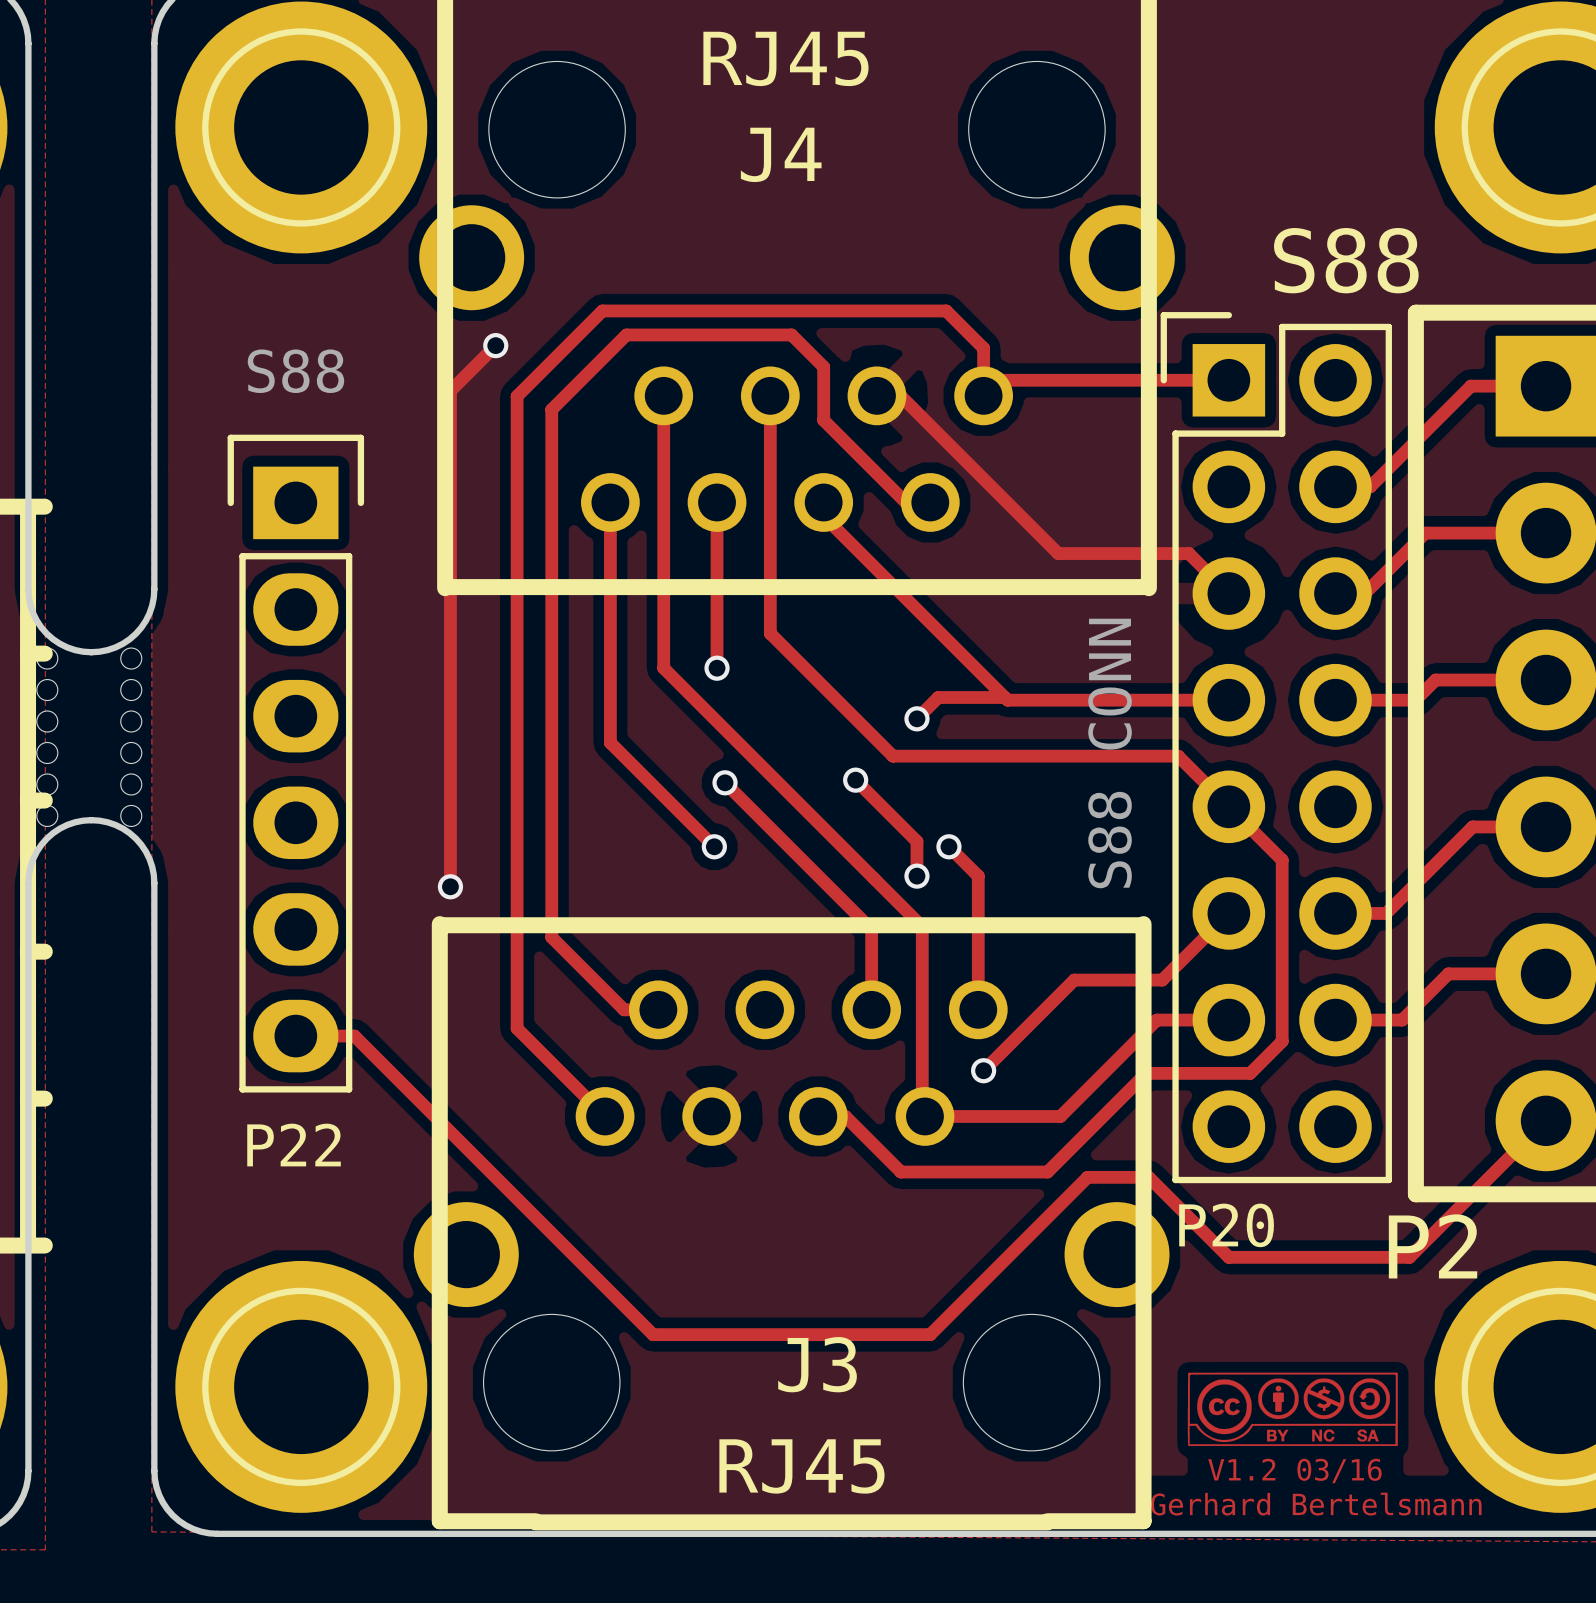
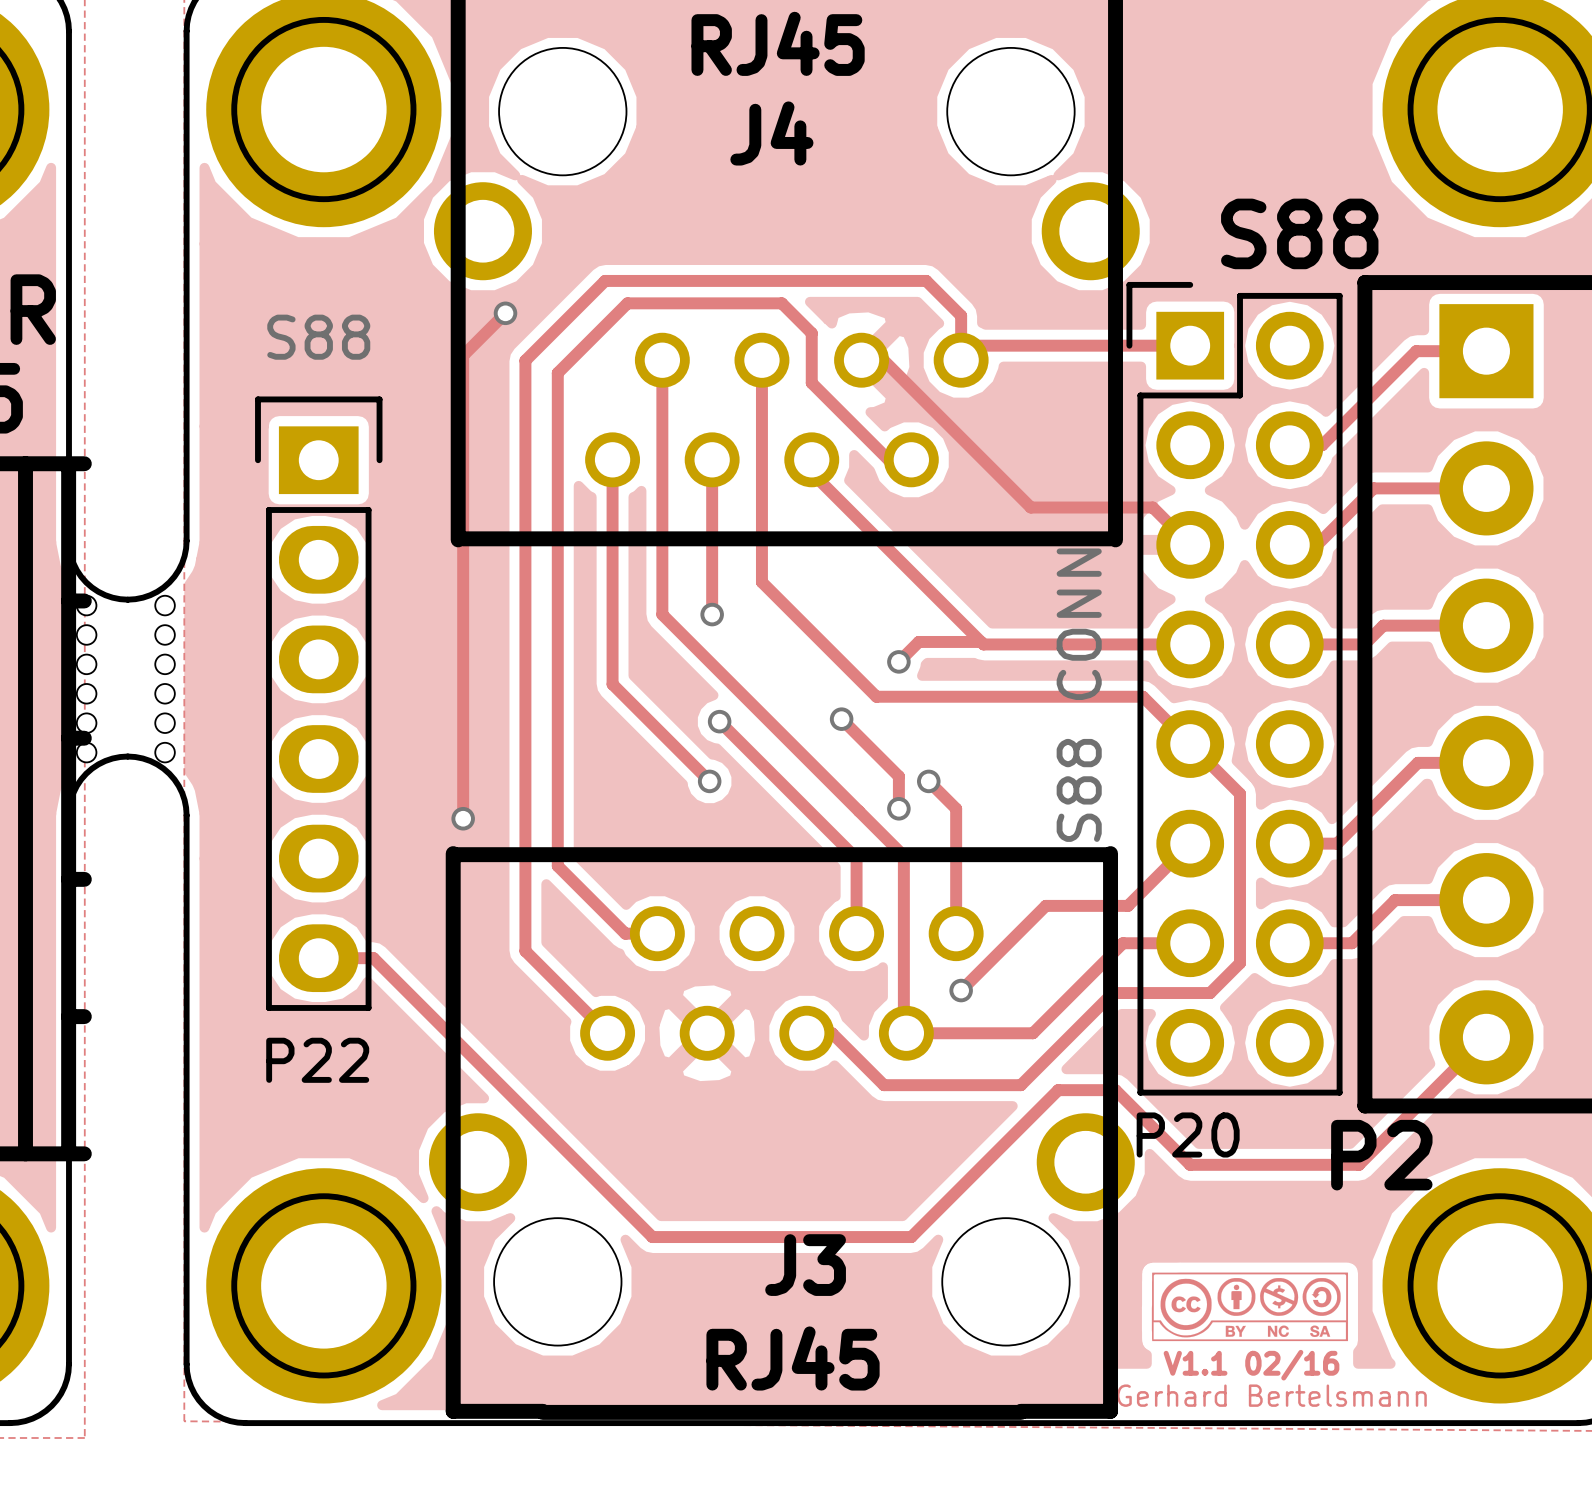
text: V1.2 03/16 (1294, 1470) -> V1.1 02/16 (1251, 1365)

